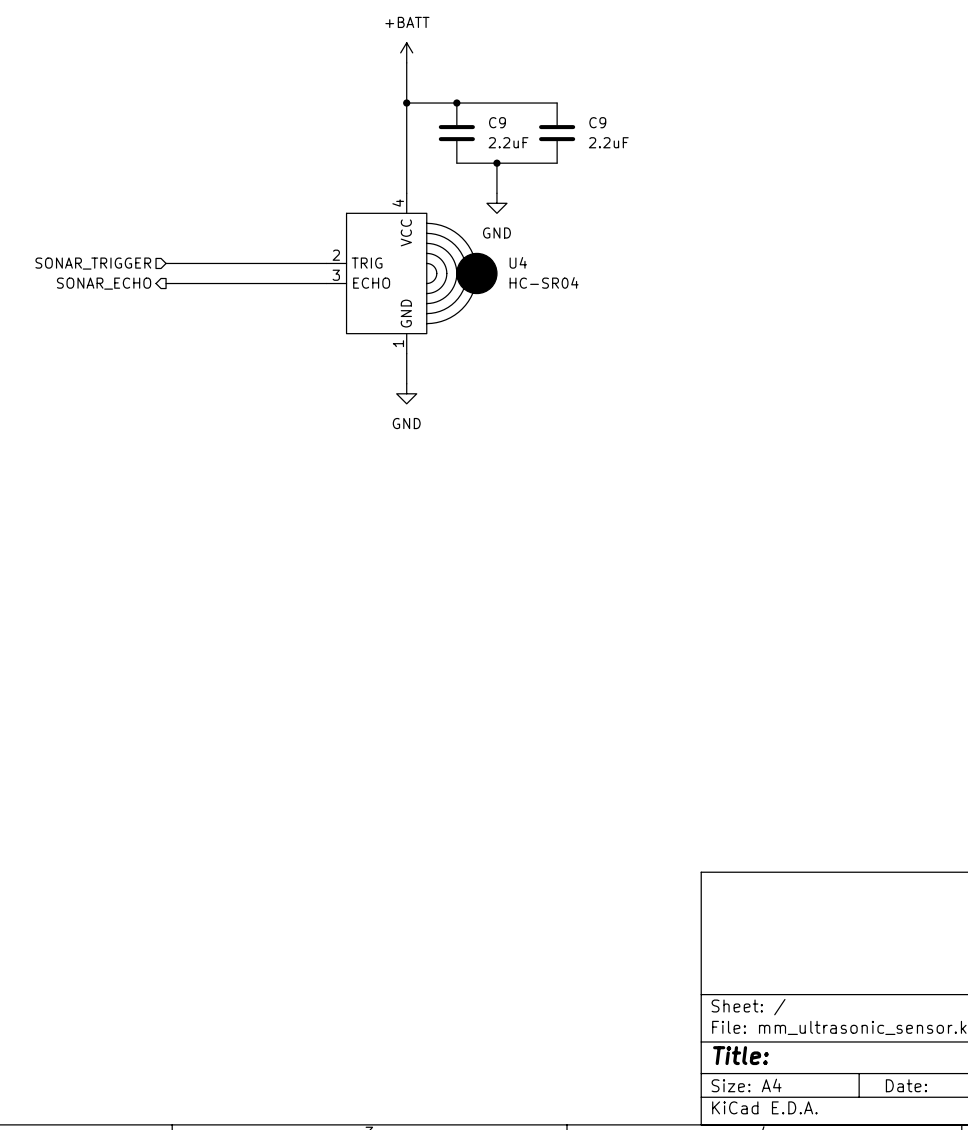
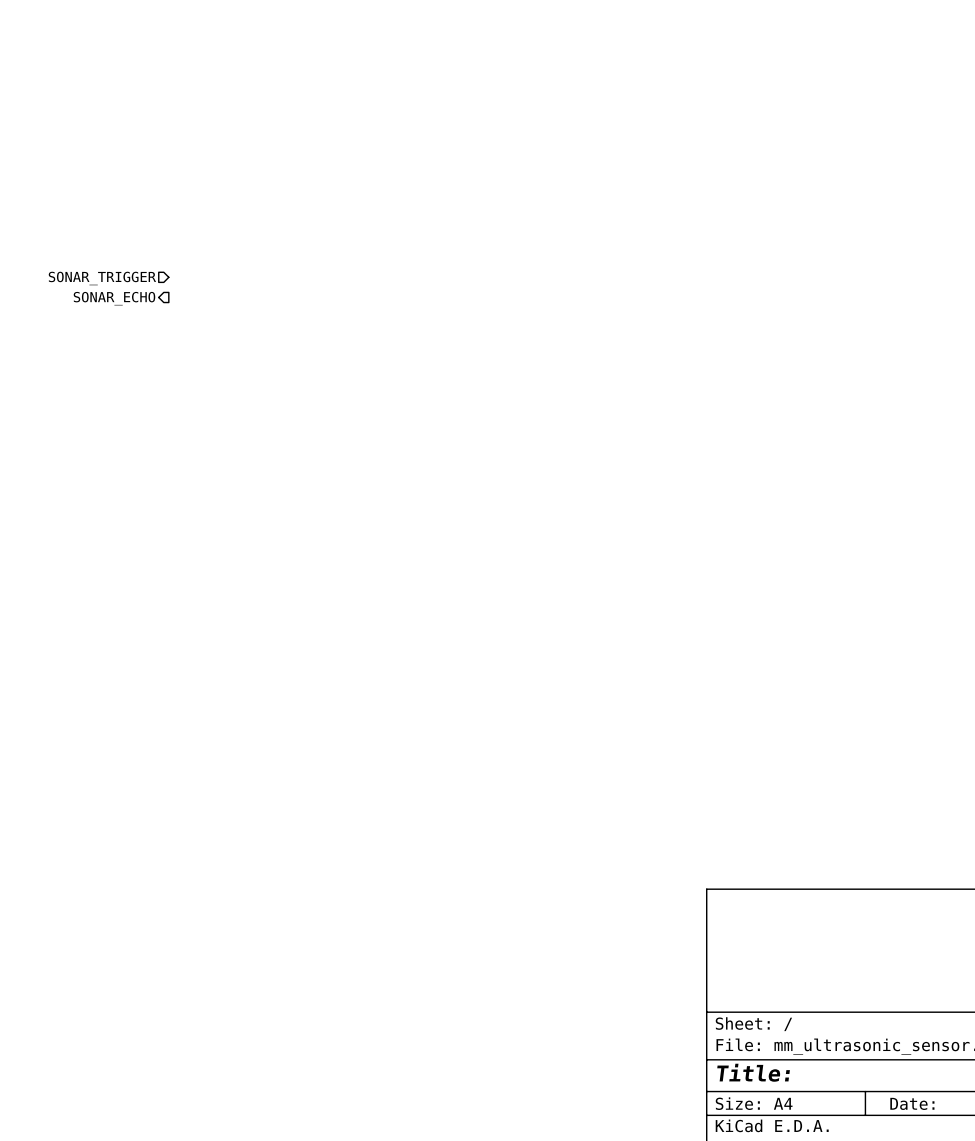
power symbol: +BATT (406, 52) -> none
wire: (406, 62) (406, 193) -> none
wire: (406, 103) (557, 103) -> none
junction: (406, 103) -> none
junction: (456, 103) -> none
C9: 2.2uF (456, 133) -> none
C9: 2.2uF (557, 133) -> none
wire: (456, 163) (557, 163) -> none
wire: (496, 163) (496, 193) -> none
junction: (496, 163) -> none
power symbol: GND (496, 203) -> none
wire: (166, 263) (326, 263) -> none
U4: HC-SR04 (411, 273) -> none
wire: (166, 283) (326, 283) -> none
wire: (406, 353) (406, 383) -> none
power symbol: GND (406, 393) -> none

